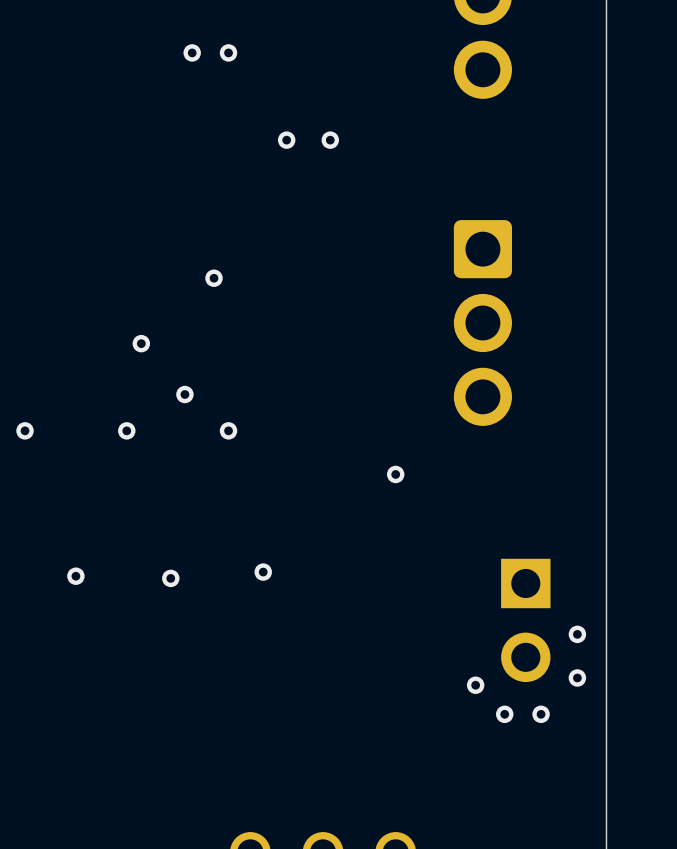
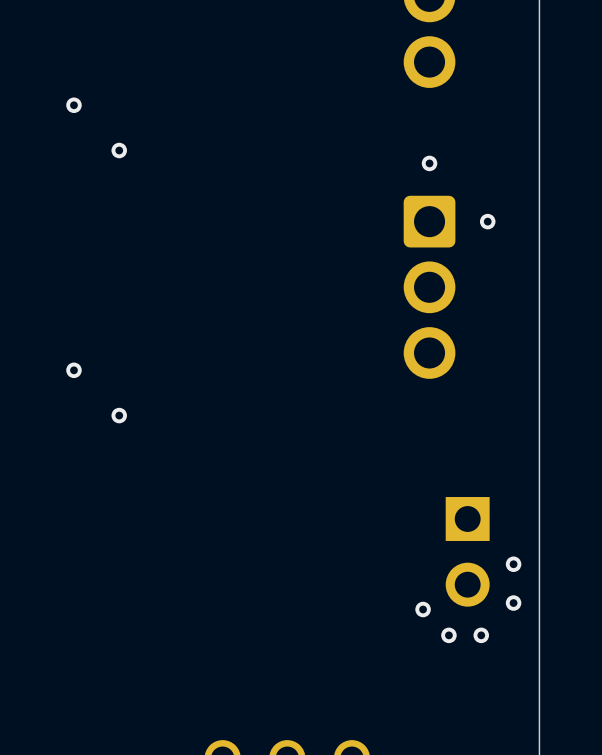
via: (192, 52) -> none
via: (228, 52) -> none
via: none -> (73, 105)
via: (286, 140) -> none
via: (330, 140) -> none
via: none -> (119, 150)
via: none -> (429, 163)
via: none -> (487, 221)
via: (214, 278) -> none
via: (141, 343) -> none
via: (184, 394) -> none
via: none -> (73, 370)
via: (25, 430) -> none
via: (126, 430) -> none
via: (228, 430) -> none
via: none -> (119, 415)
via: (395, 474) -> none
via: (263, 572) -> none
via: (75, 576) -> none
via: (170, 578) -> none

